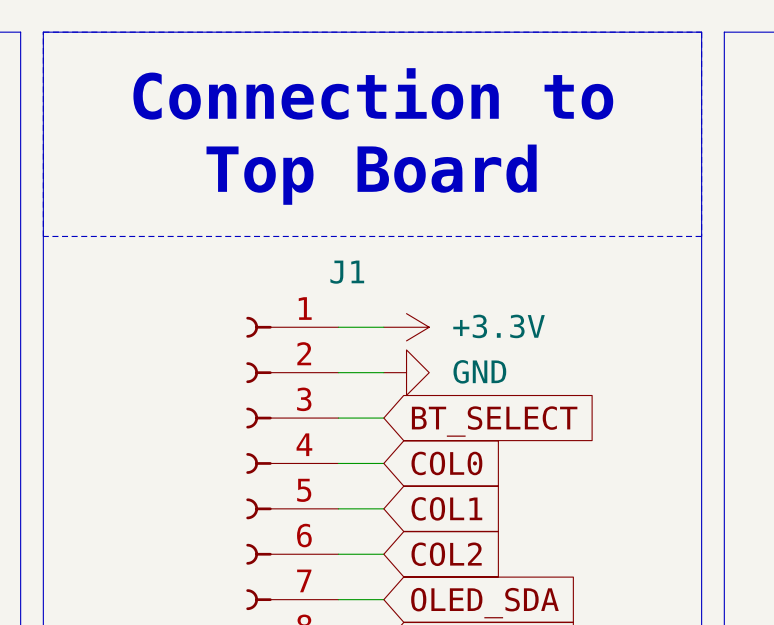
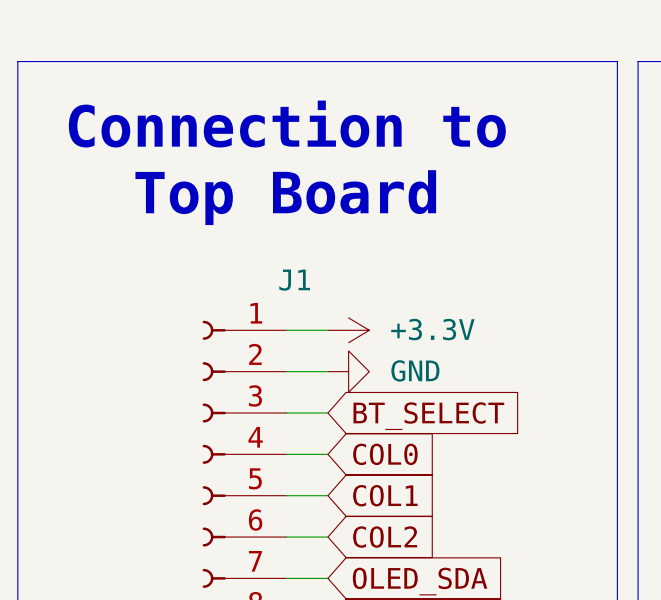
line: (43, 32) (701, 32) (701, 236) (43, 236) (43, 32) -> none
text position: Connection to (373, 93) -> Connection to (287, 124)
text position: Top Board (371, 174) -> Top Board (285, 197)

